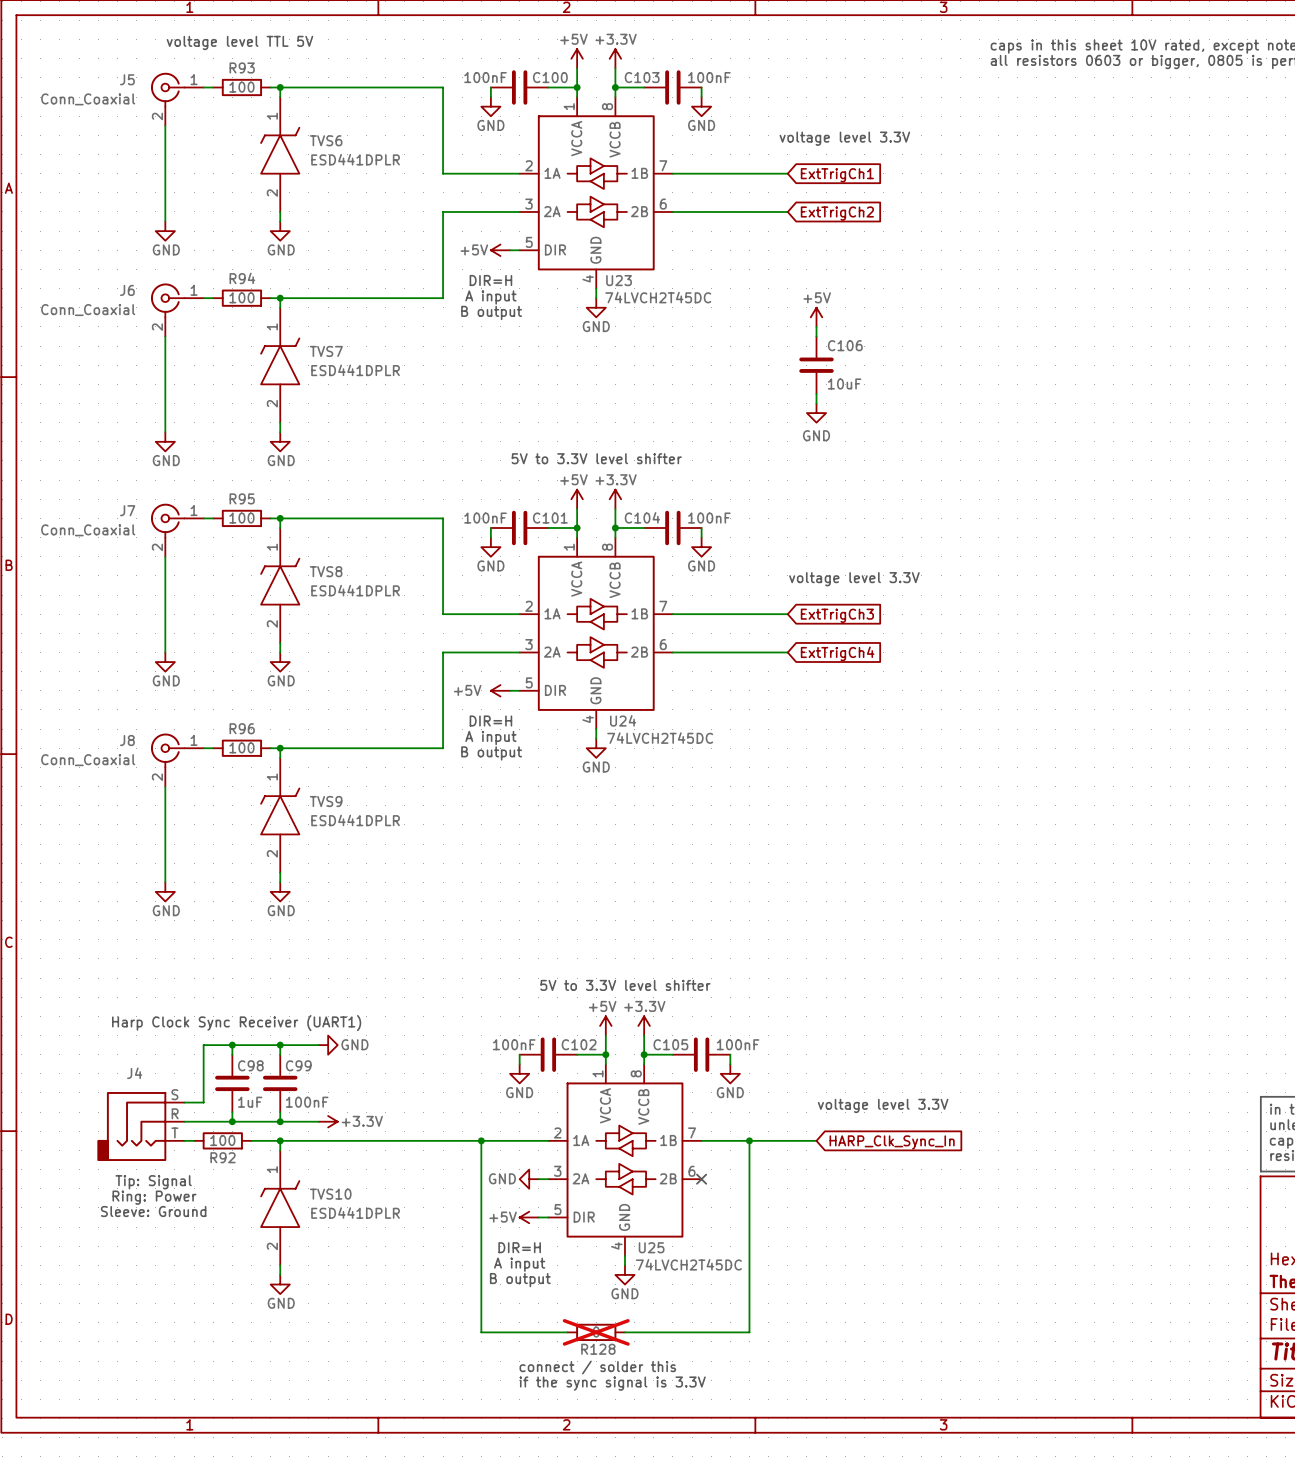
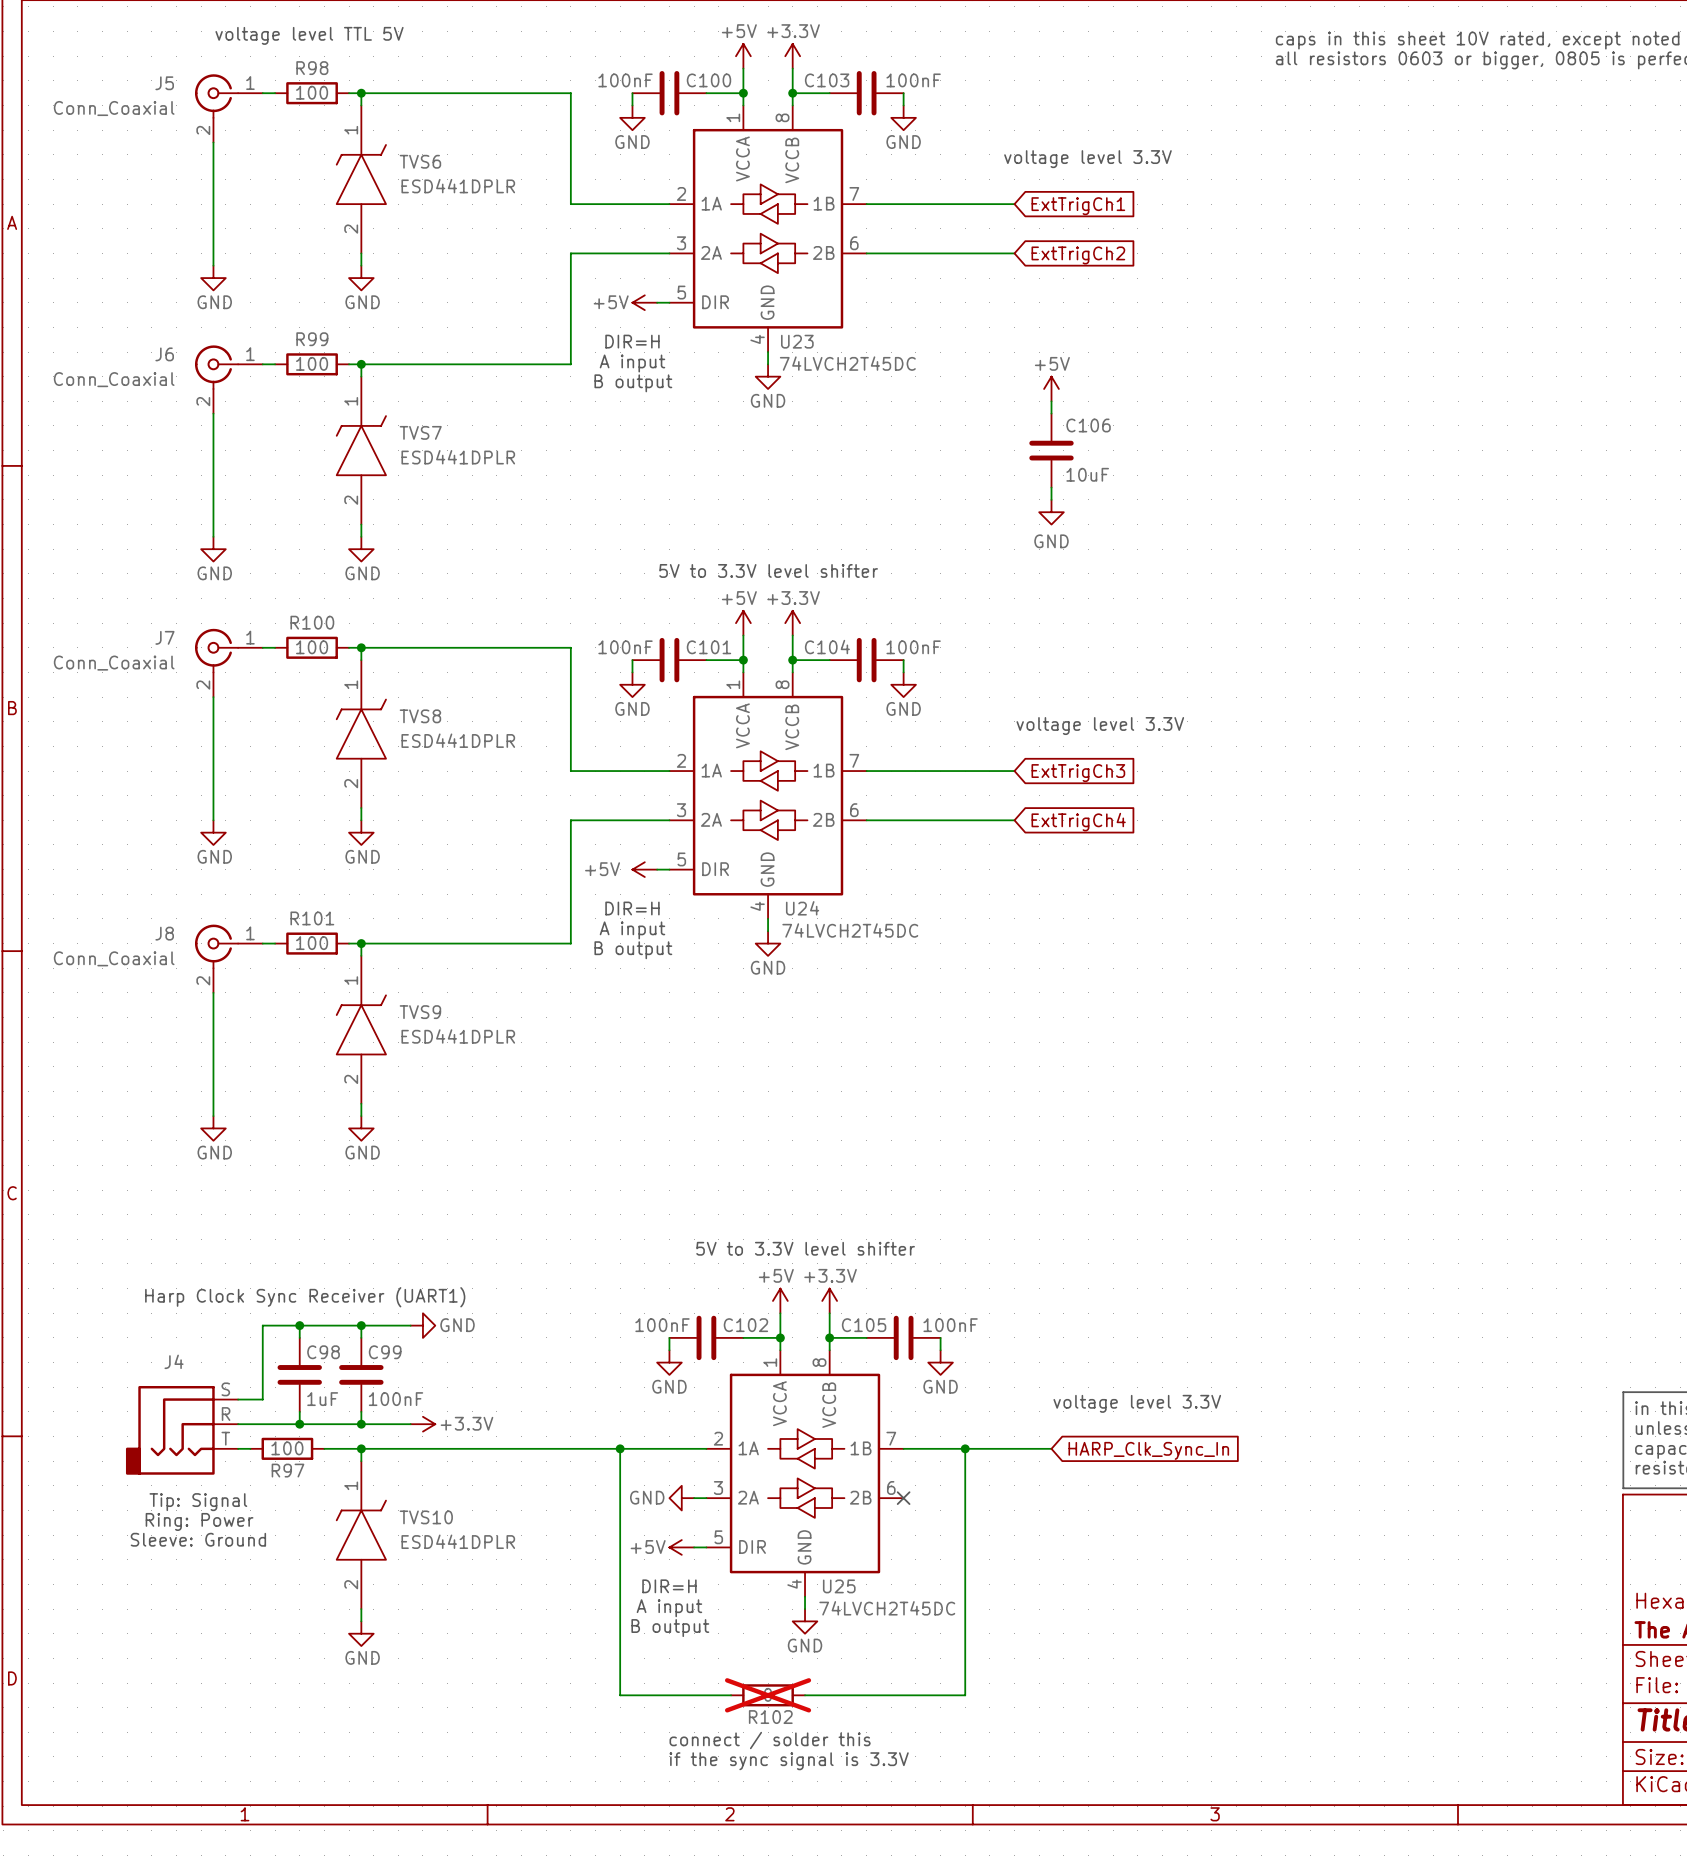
R93 name: R93 (242, 67) -> R98 (312, 68)
R94 name: R94 (242, 278) -> R99 (312, 339)
R95 name: R95 (242, 498) -> R100 (312, 622)
R96 name: R96 (242, 728) -> R101 (312, 918)
R92 name: R92 (223, 1157) -> R97 (287, 1470)
R128 name: R128 (598, 1349) -> R102 (770, 1717)

